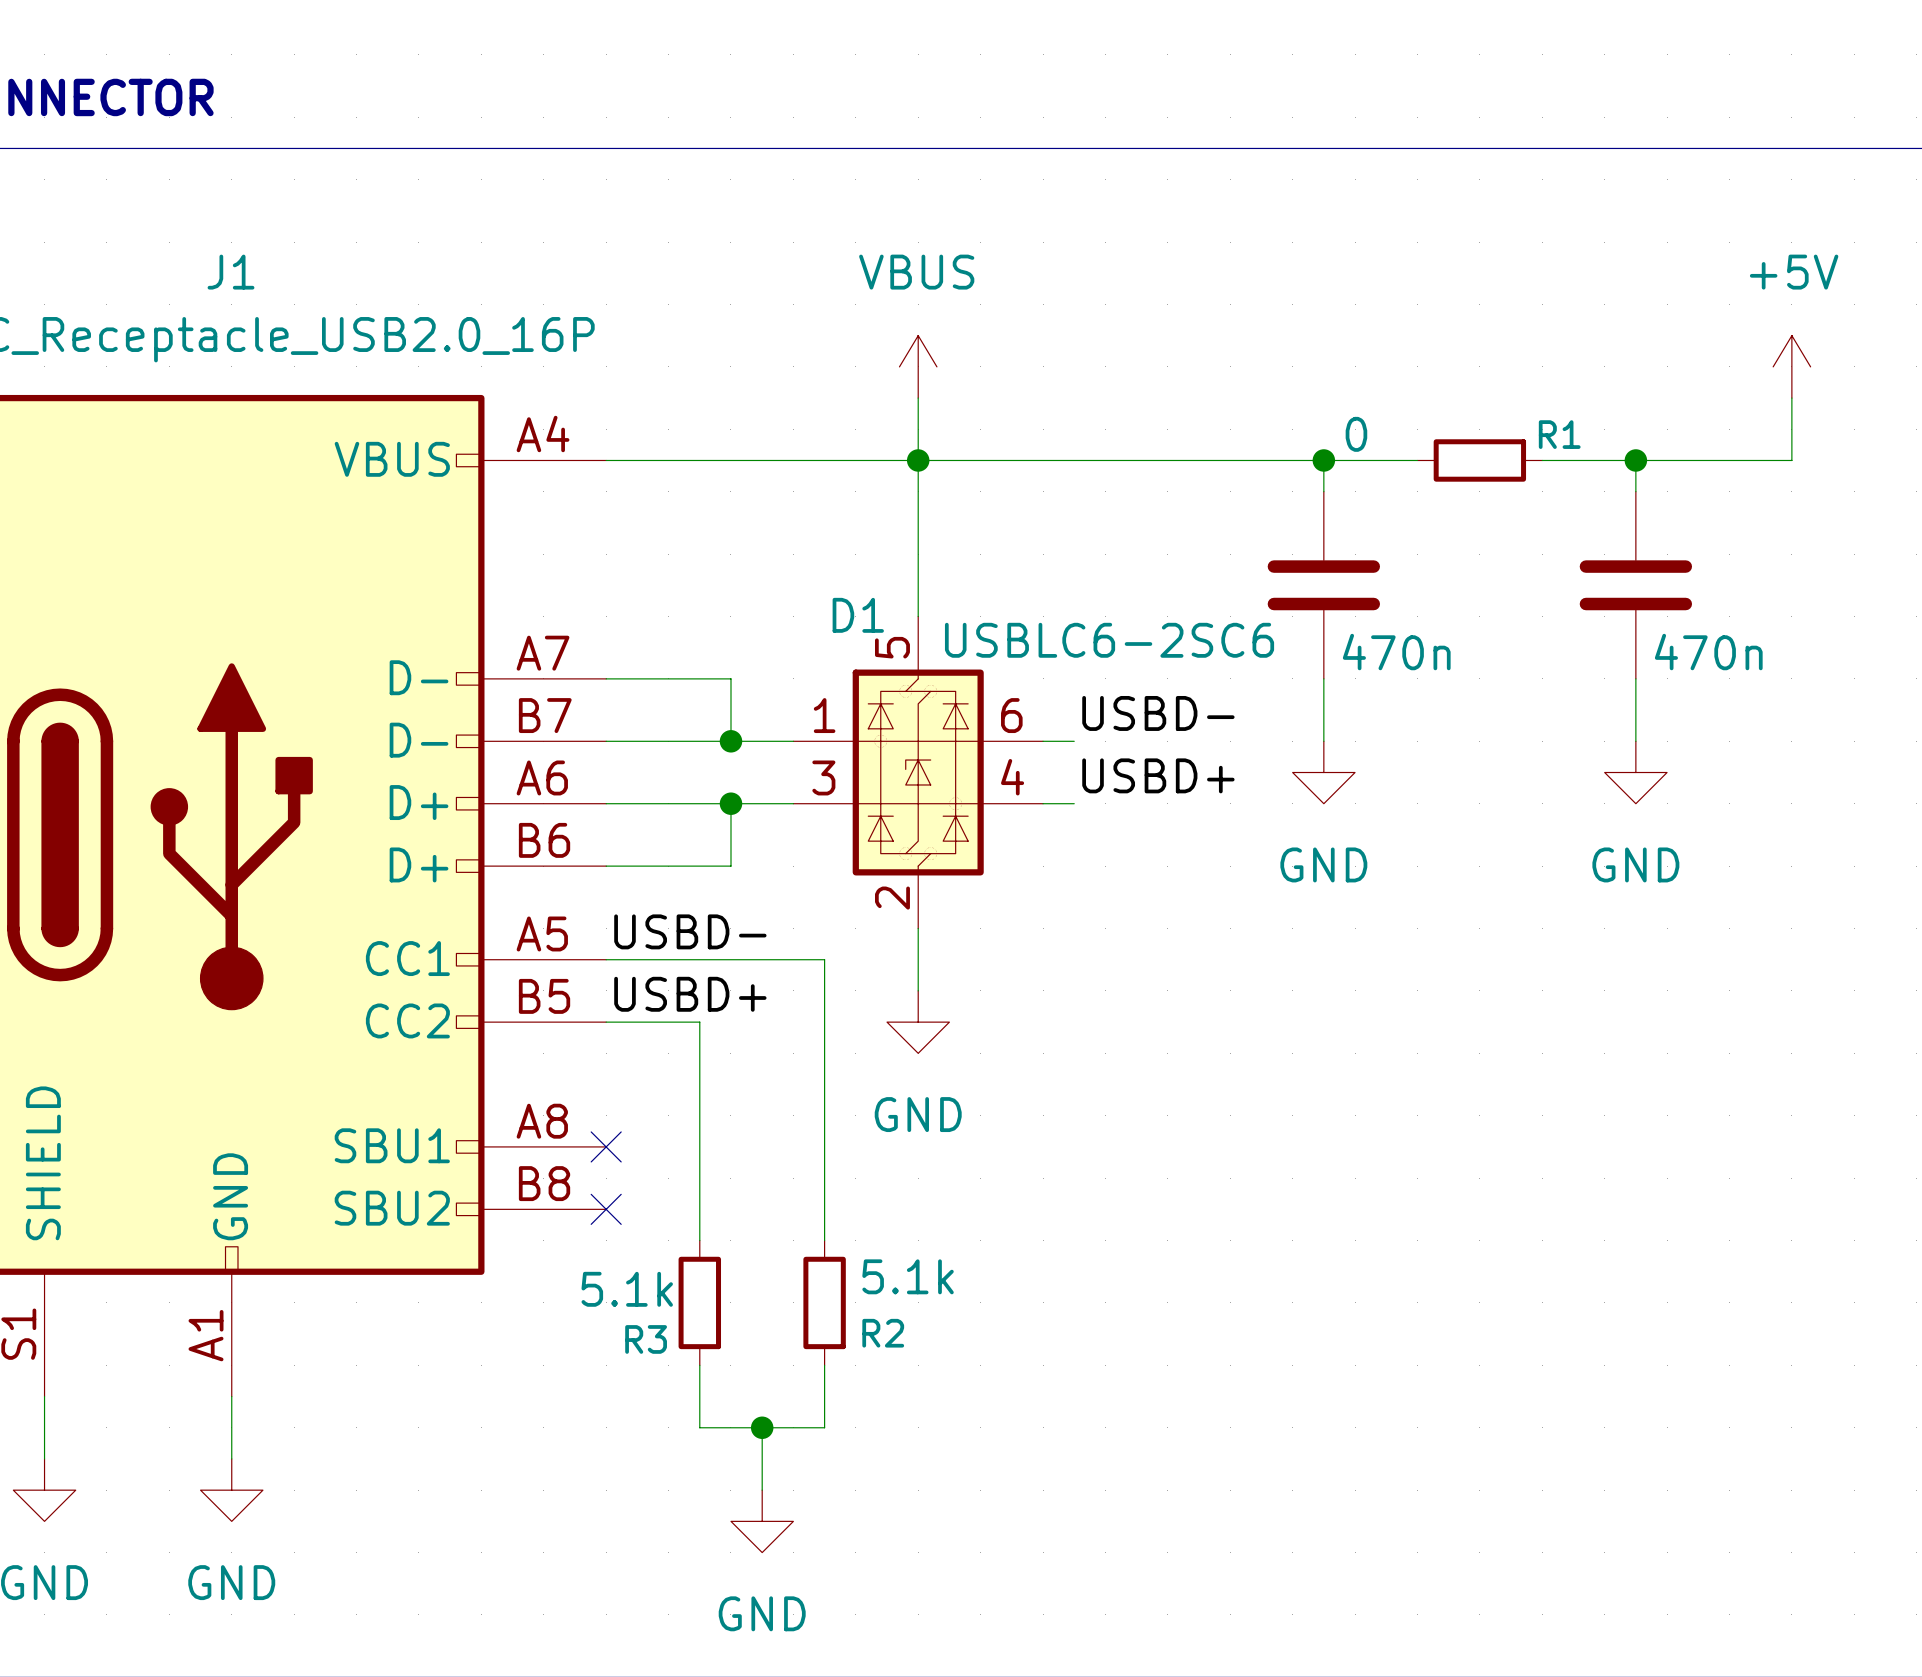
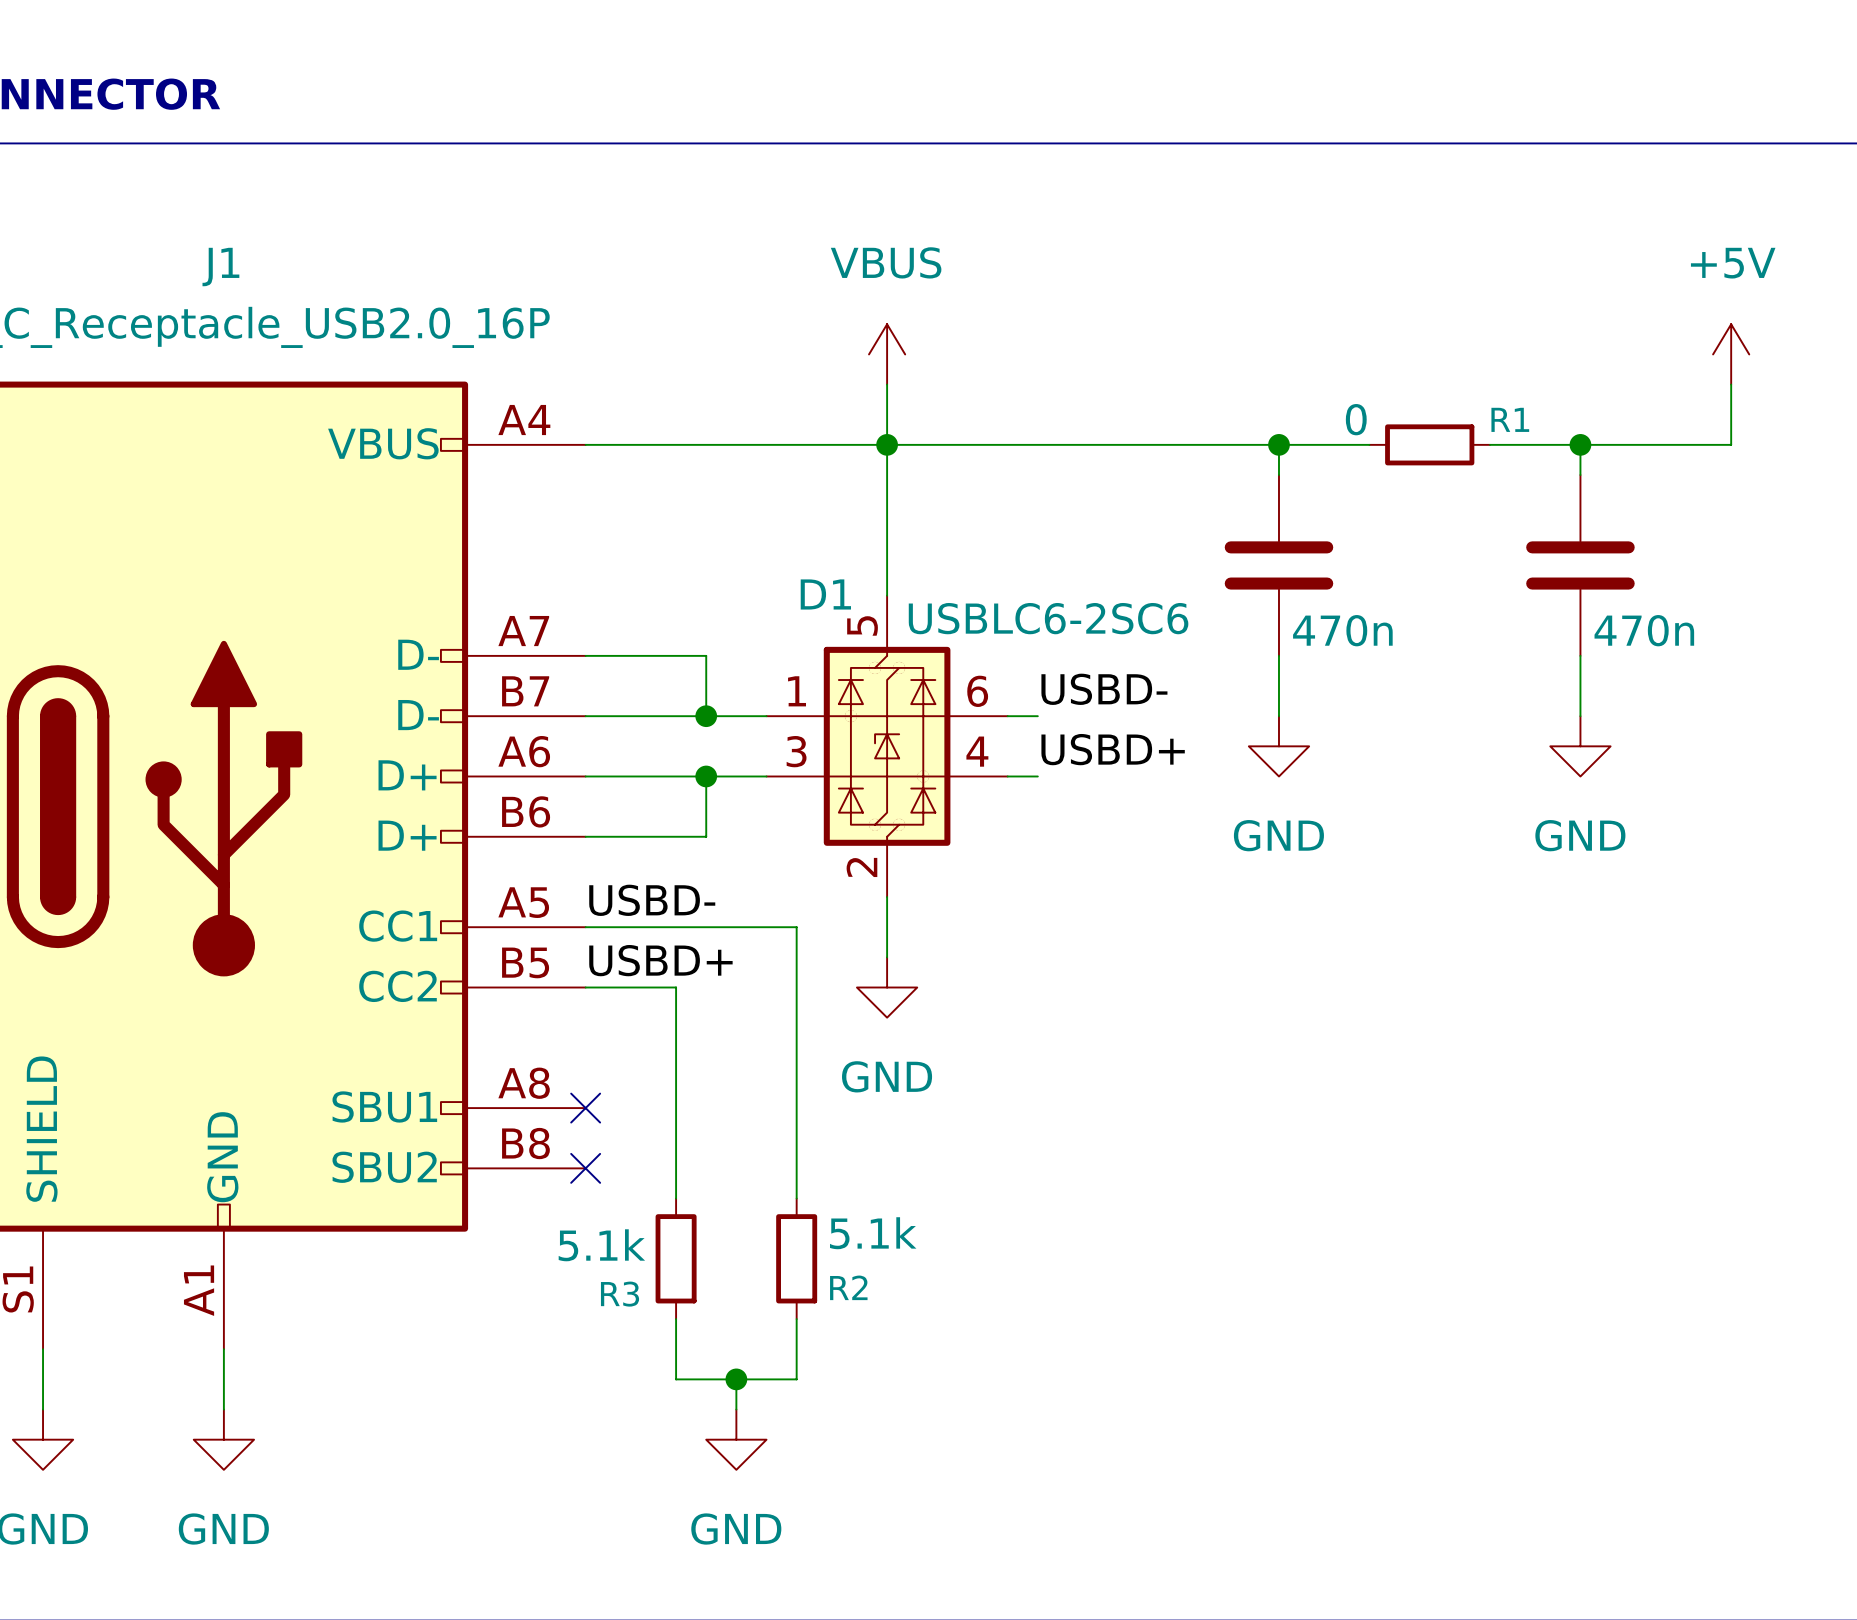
R1 value position: 0 (1356, 434) -> 0 (1356, 419)
power symbol position: GND (762, 1521) -> GND (736, 1439)

